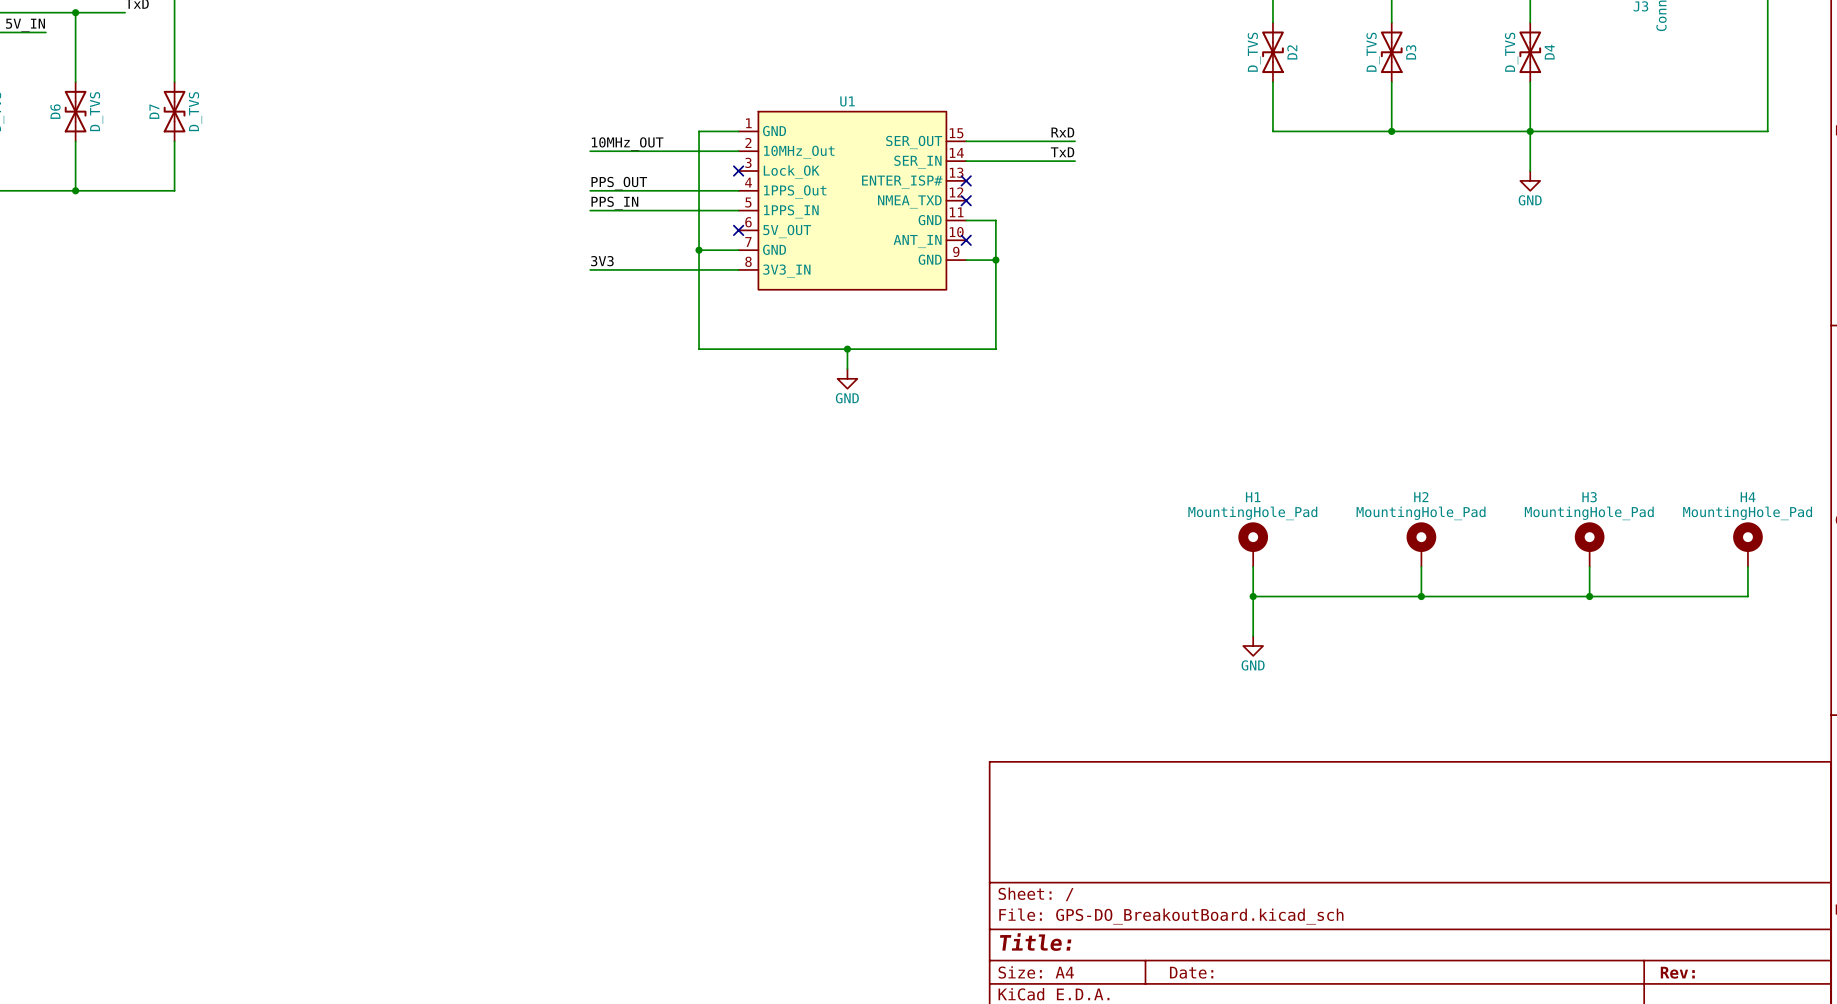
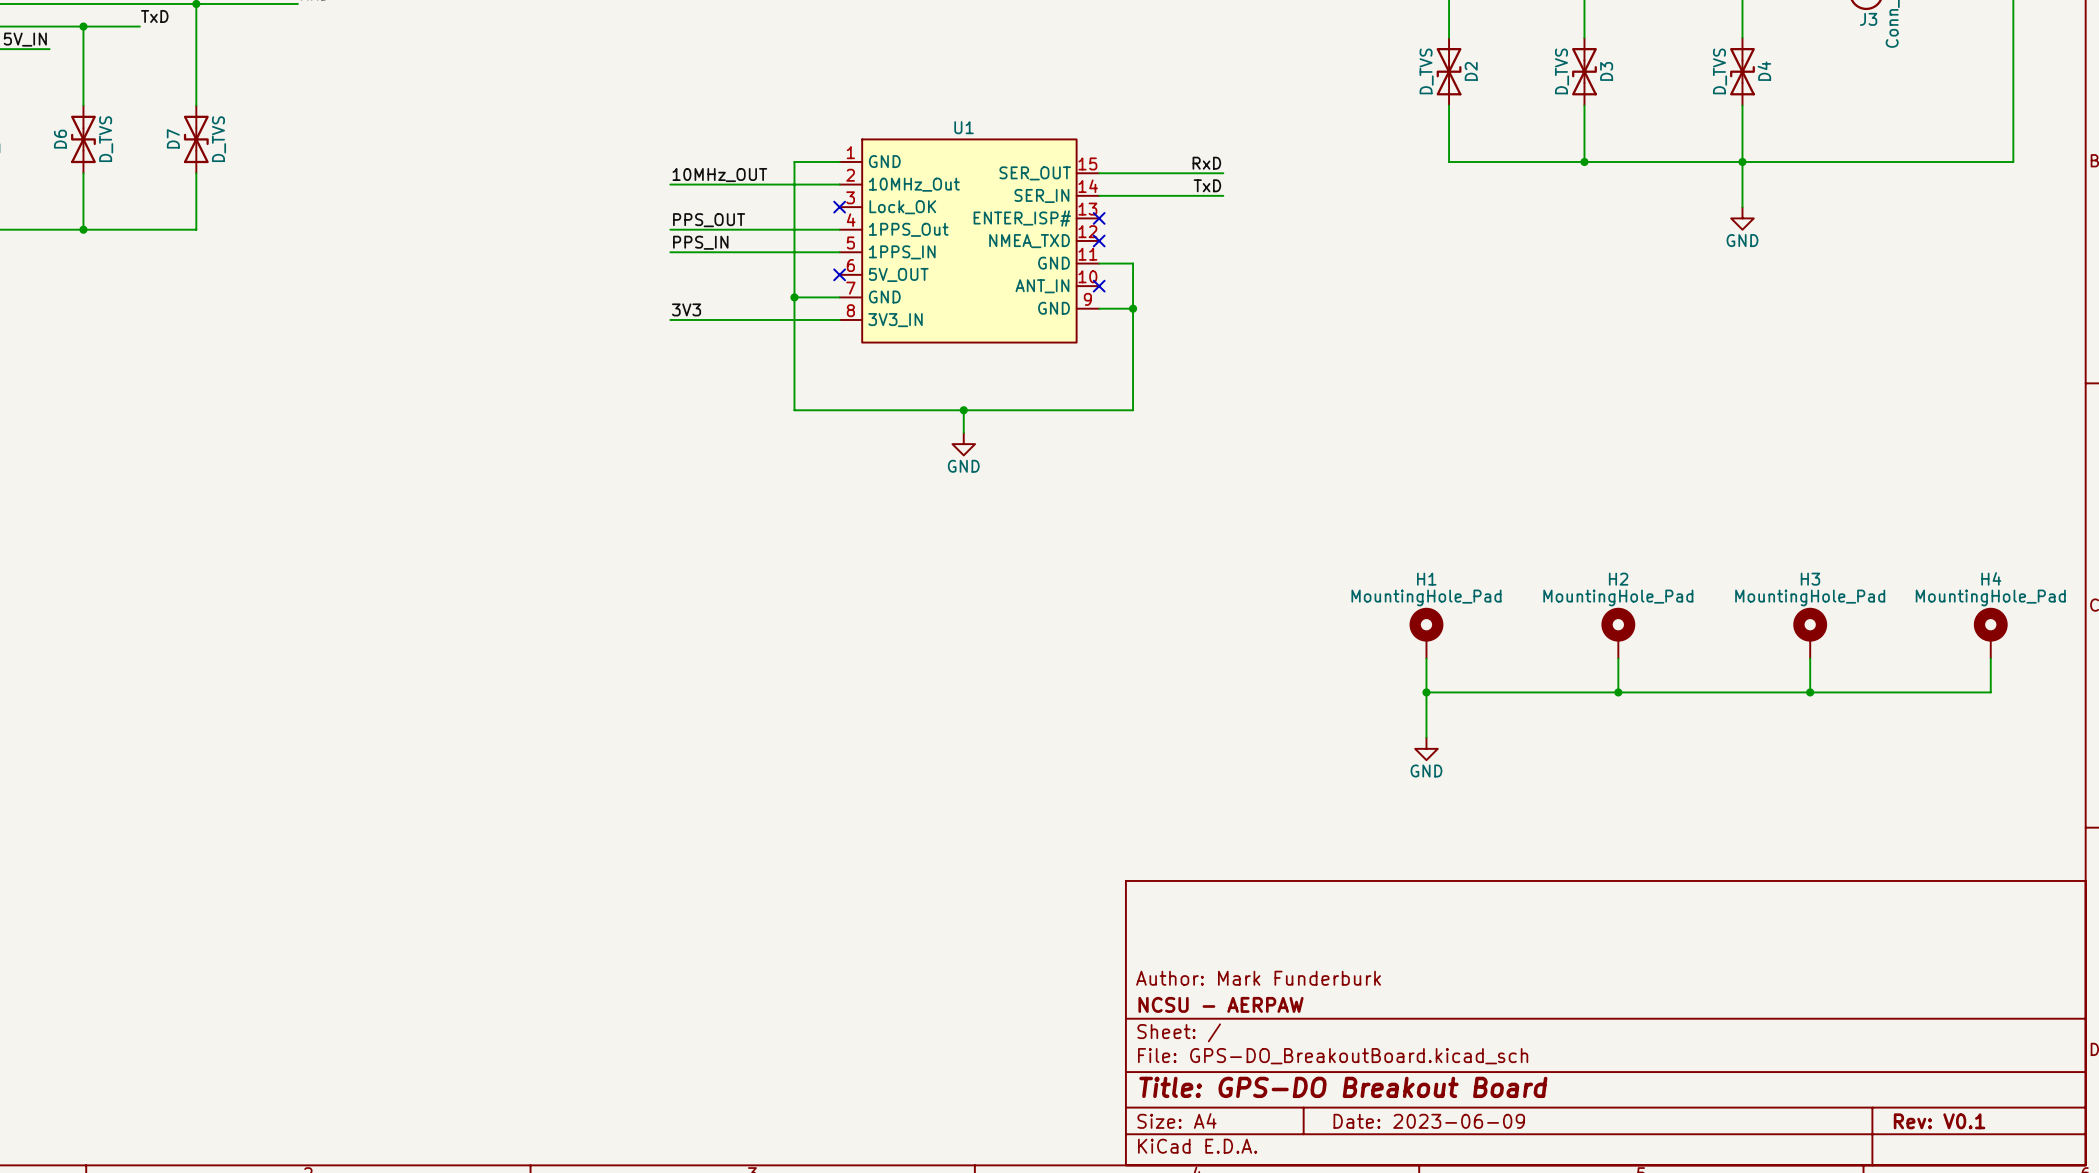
title block: none -> Author: Mark Funderburk (1258, 978)
title block: none -> NCSU - AERPAW (1220, 1004)
title block: Title: (1035, 942) -> Title: GPS-DO Breakout Board (1343, 1087)
title block: Date: (1191, 972) -> Date: 2023-06-09 (1429, 1121)
title block: Rev: (1677, 972) -> Rev: V0.1 (1939, 1121)

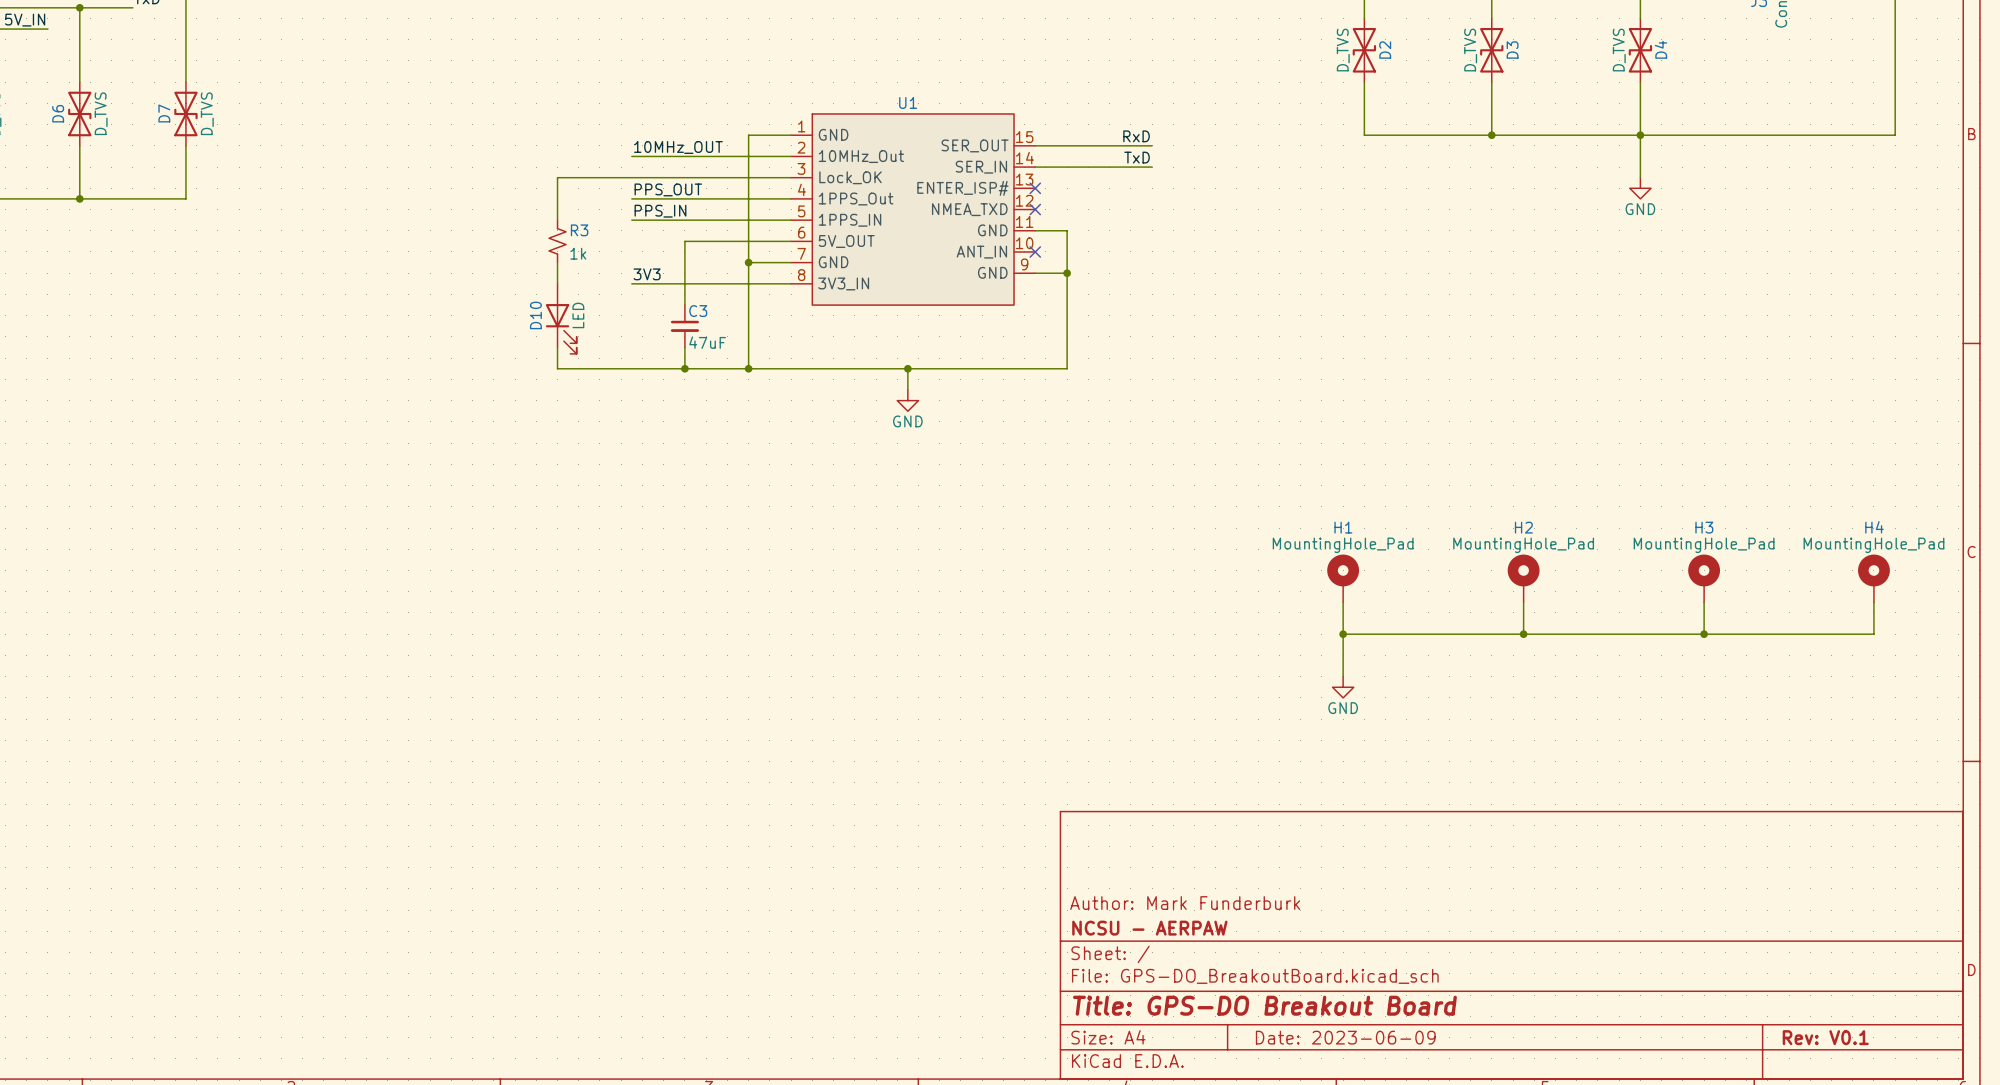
wire: none -> (791, 177) (557, 177) (557, 220)
no-connect mark: (839, 207) -> none
R3: none -> 1k (557, 241)
wire: none -> (791, 241) (684, 241) (684, 305)
no-connect mark: (839, 274) -> none
wire: none -> (557, 262) (557, 283)
D10: none -> LED (561, 318)
C3: none -> 47uF (684, 326)
wire: none -> (557, 347) (557, 368) (748, 368)
wire: none -> (684, 347) (684, 368)
junction: none -> (684, 368)
junction: none -> (748, 368)

